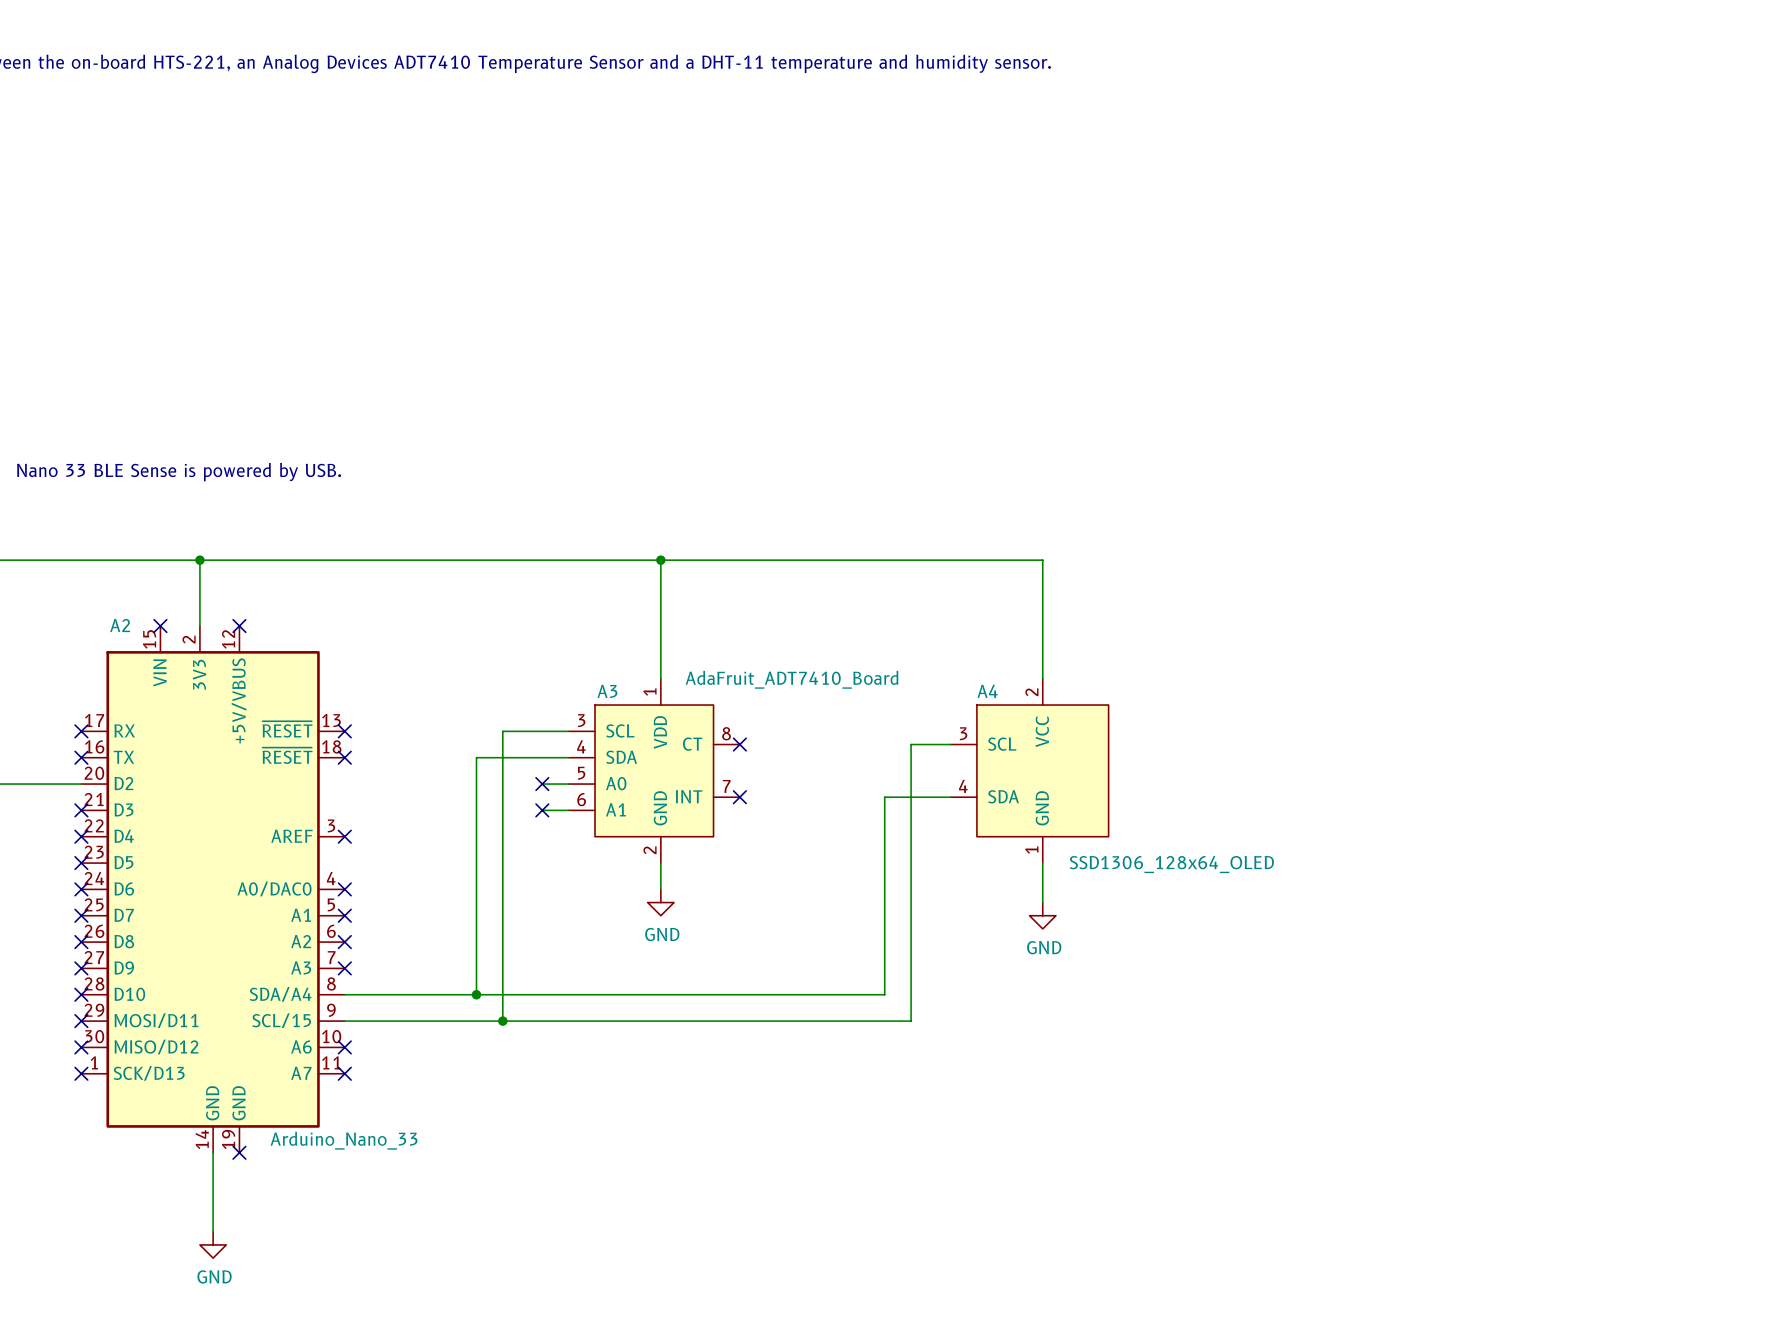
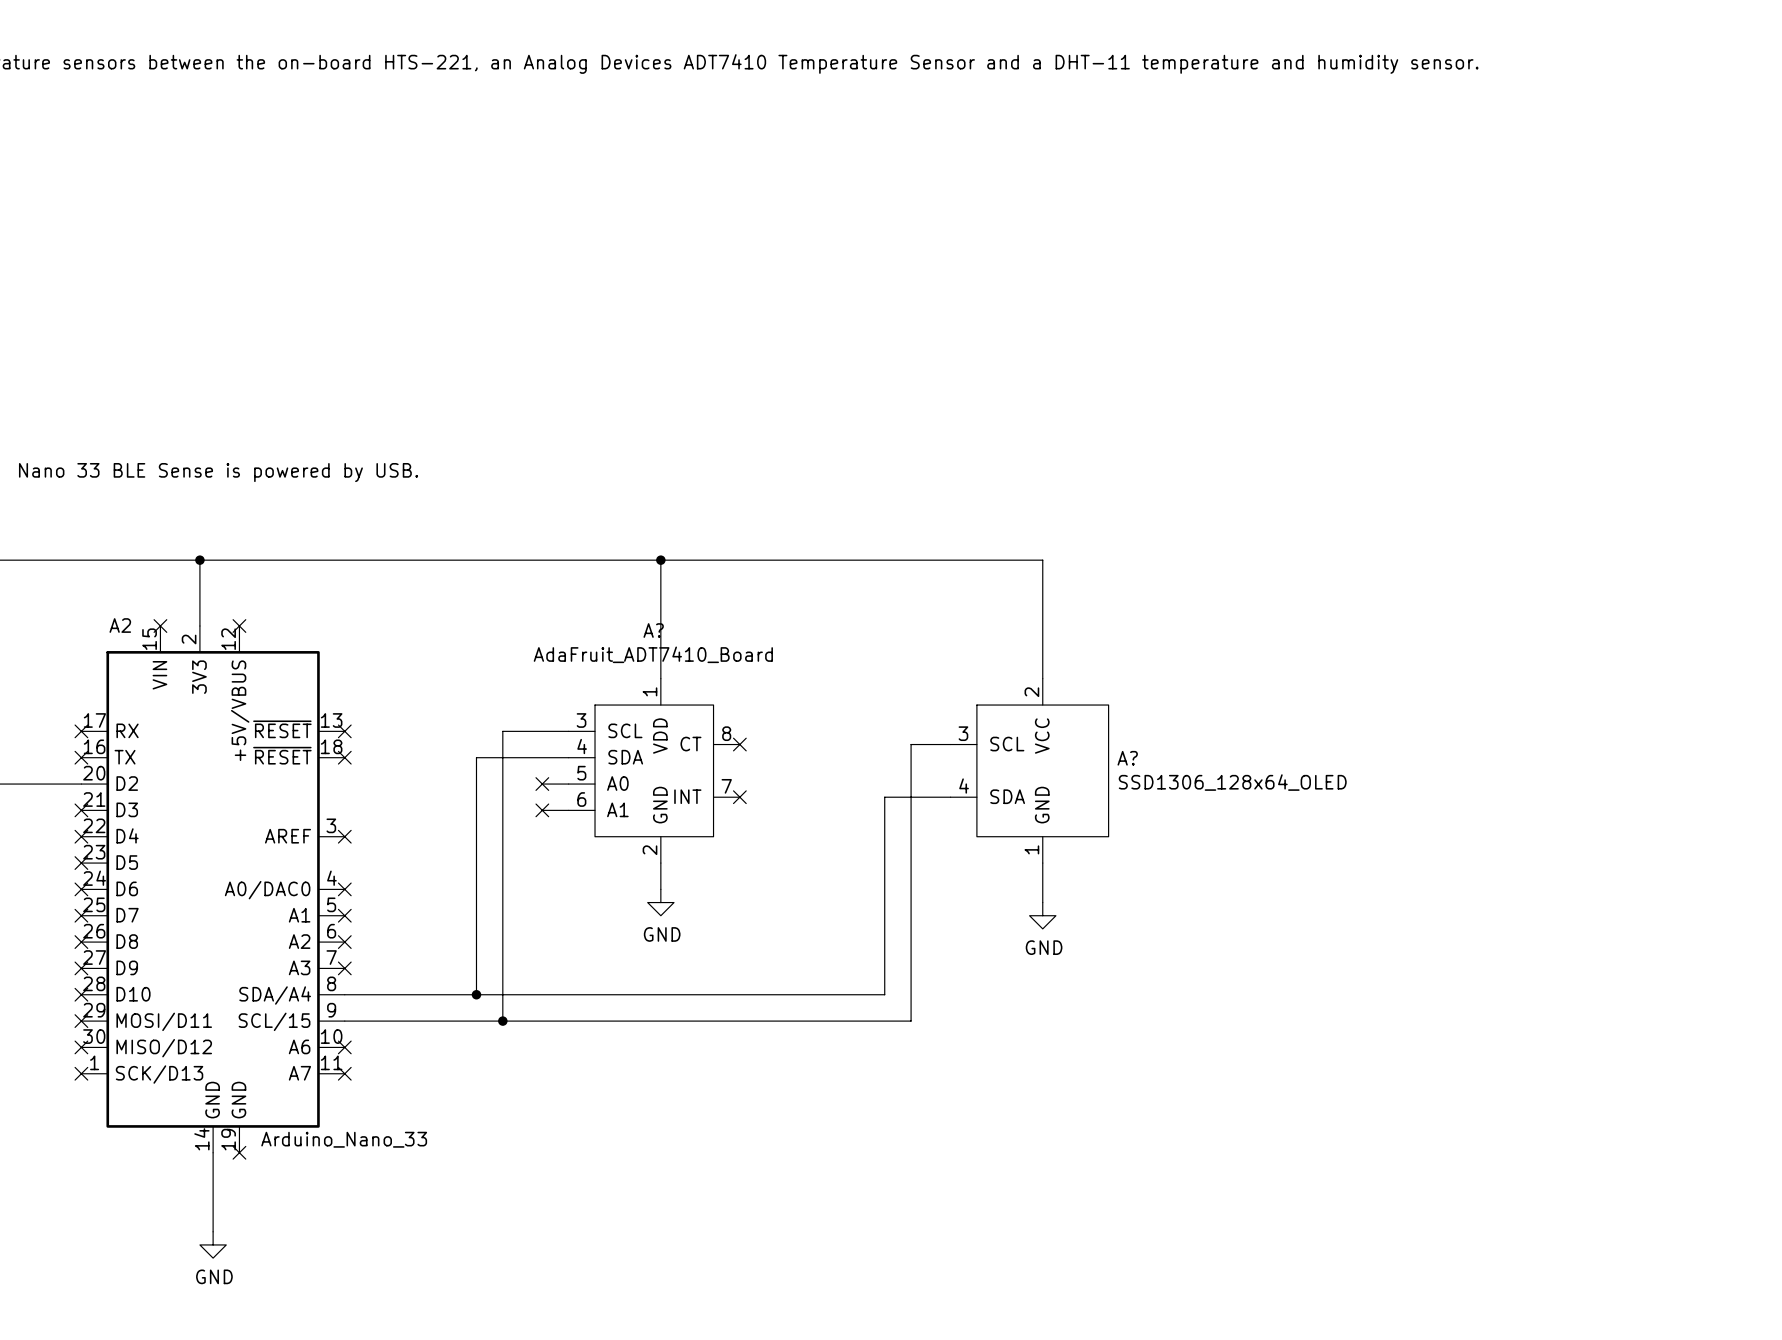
A3 value position: AdaFruit_ADT7410_Board (792, 679) -> AdaFruit_ADT7410_Board (653, 654)
A3 name: A3 (607, 691) -> A? (653, 630)
A4 name: A4 (987, 691) -> A? (1127, 758)
A4 value position: SSD1306_128x64_OLED (1171, 864) -> SSD1306_128x64_OLED (1232, 782)

